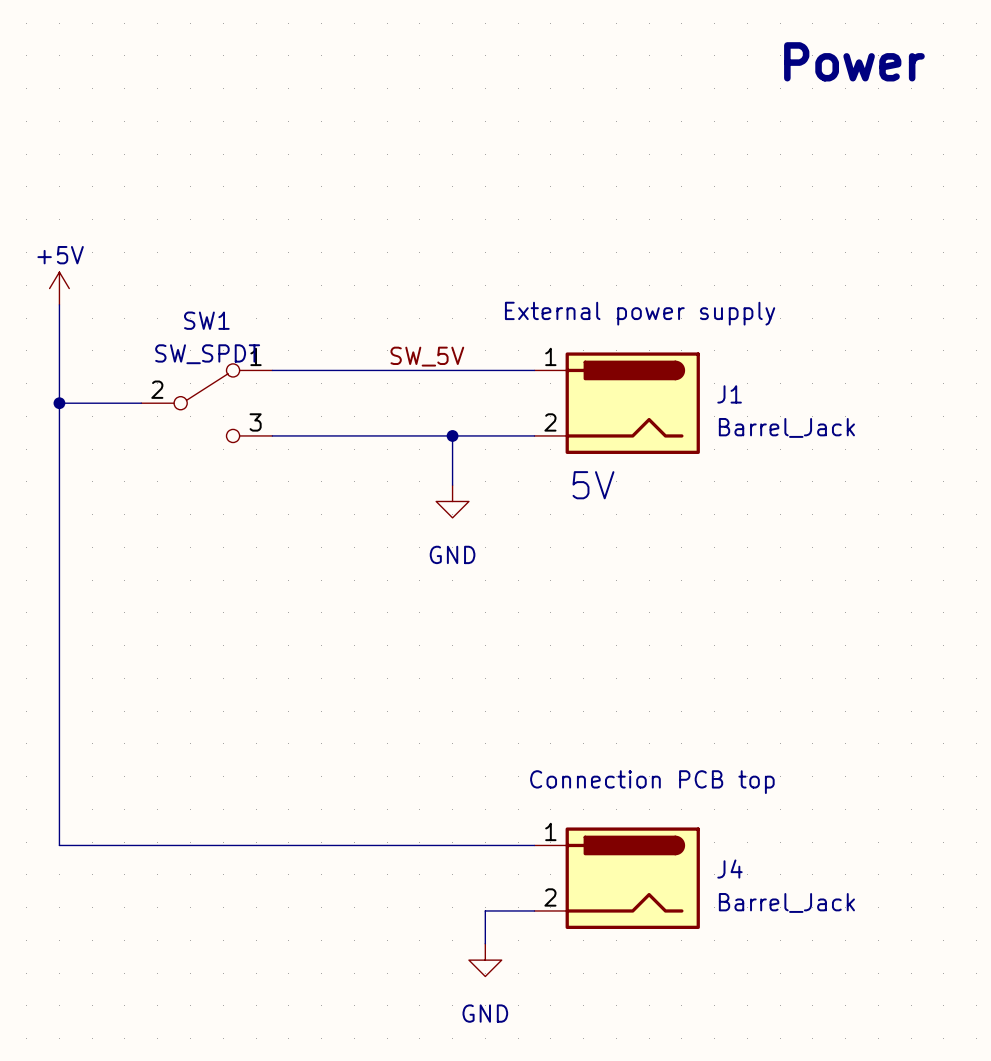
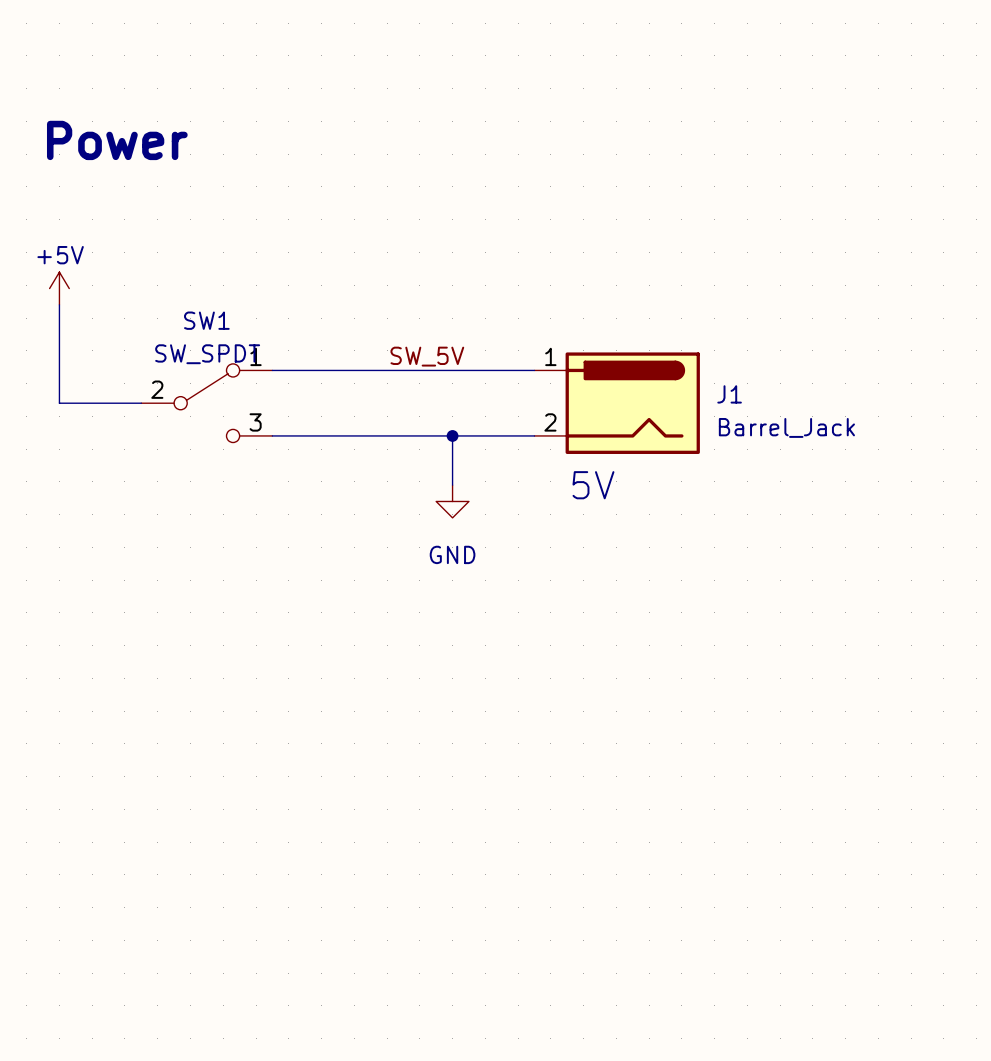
text: Power (854, 61) -> none
text: none -> Power (117, 140)
text: External power supply (640, 313) -> none
wire: (59, 403) (59, 845) (534, 845) -> none
junction: (59, 403) -> none
text: Connection PCB top (652, 782) -> none
J4: Barrel_Jack (617, 878) -> none
wire: (534, 910) (485, 910) (485, 943) -> none
power symbol: GND (485, 960) -> none

